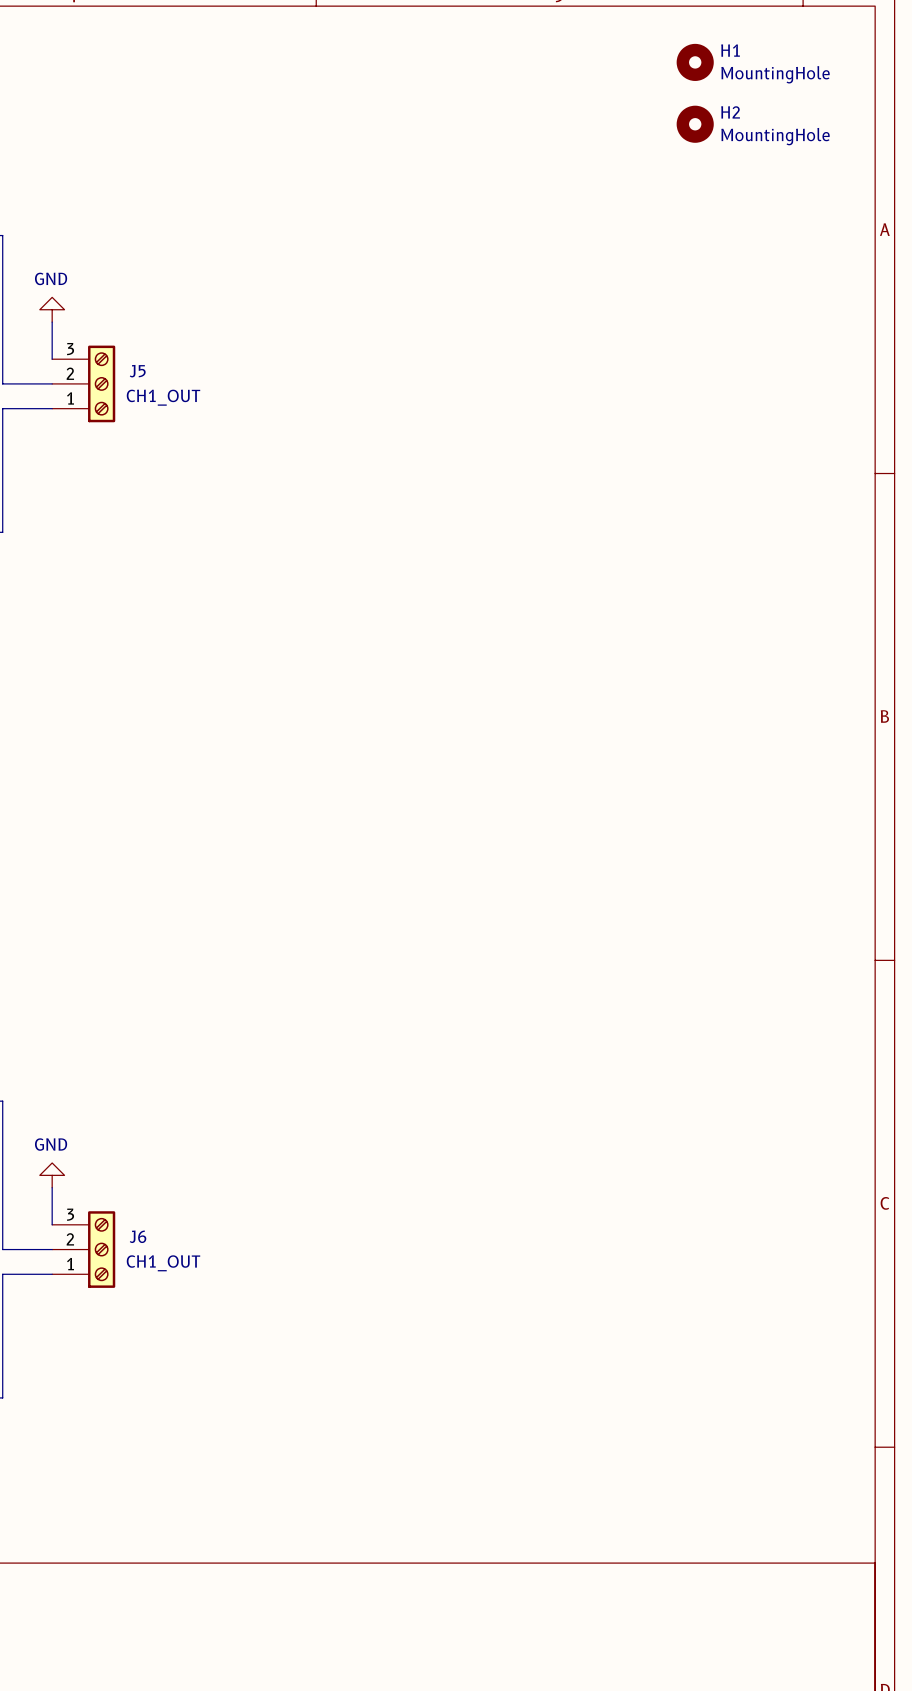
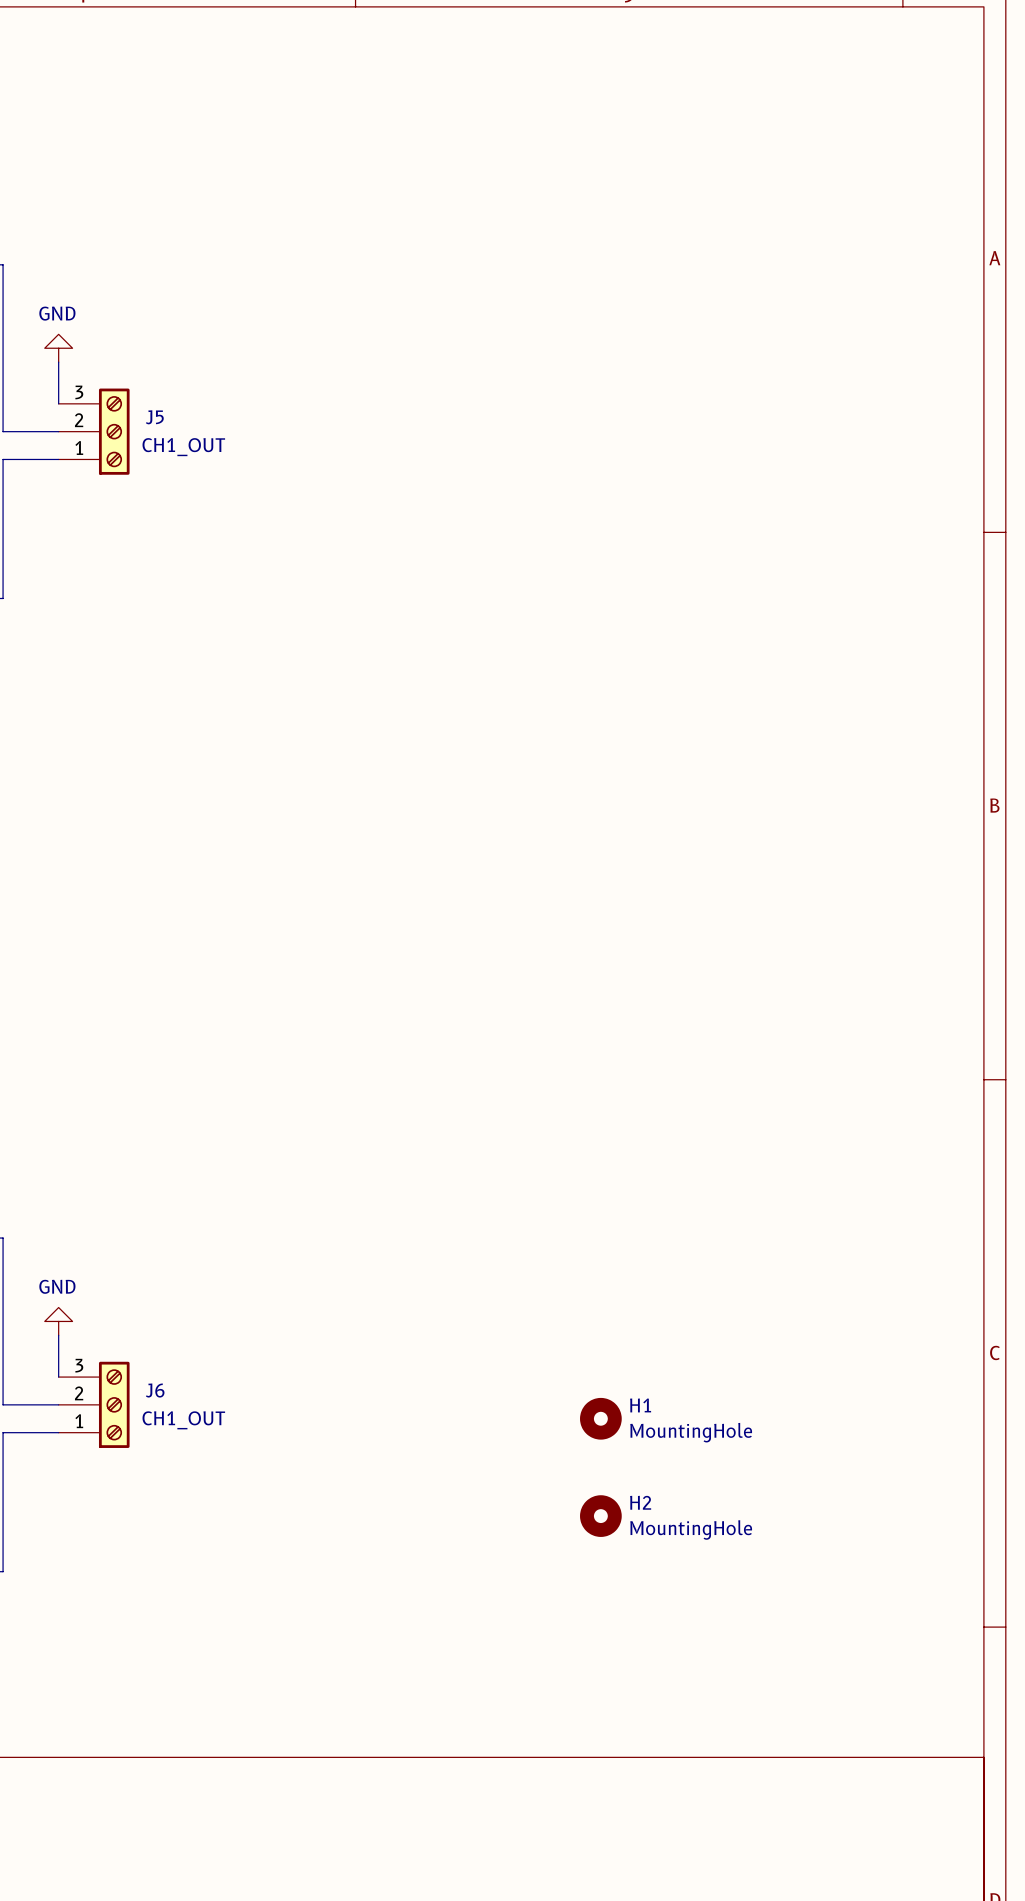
H1 position: (695, 62) -> (600, 1418)
H2 position: (695, 124) -> (600, 1516)

